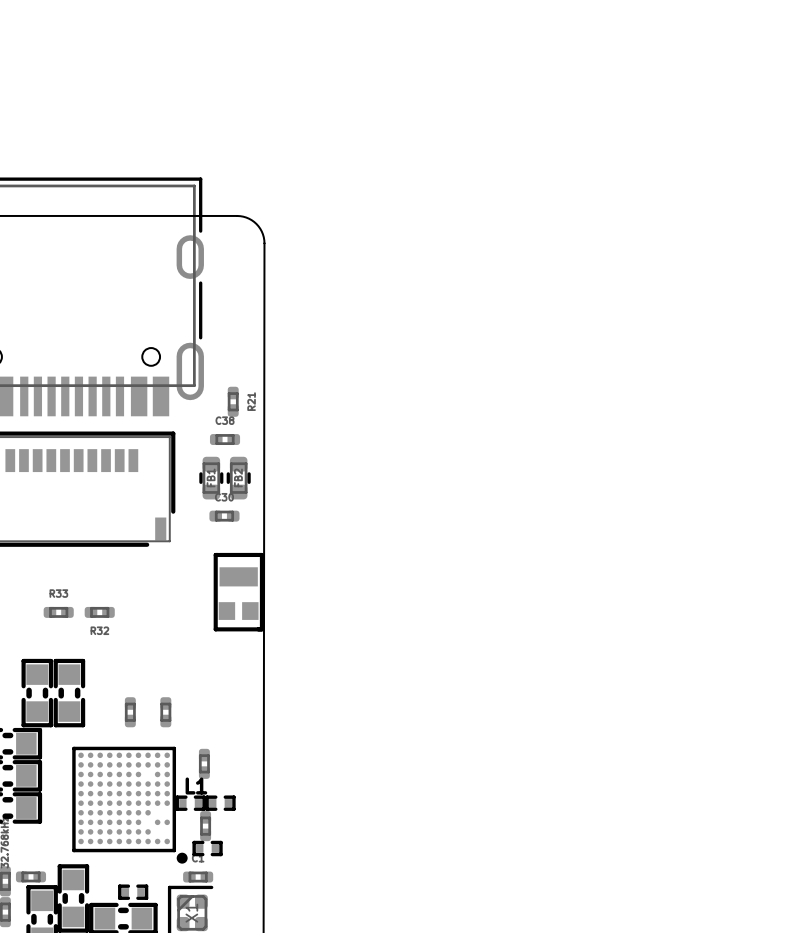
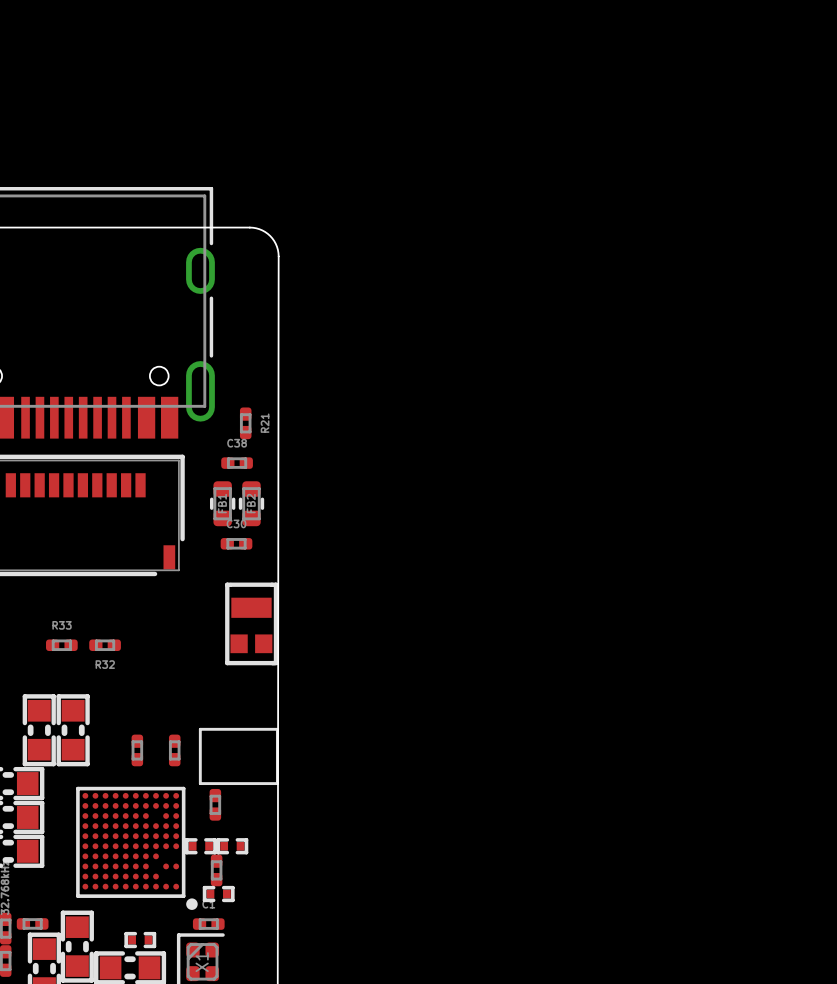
line: none -> (200, 729) (277, 729) (277, 783) (200, 783) (200, 729)
L1 name: L1 (196, 786) -> none

